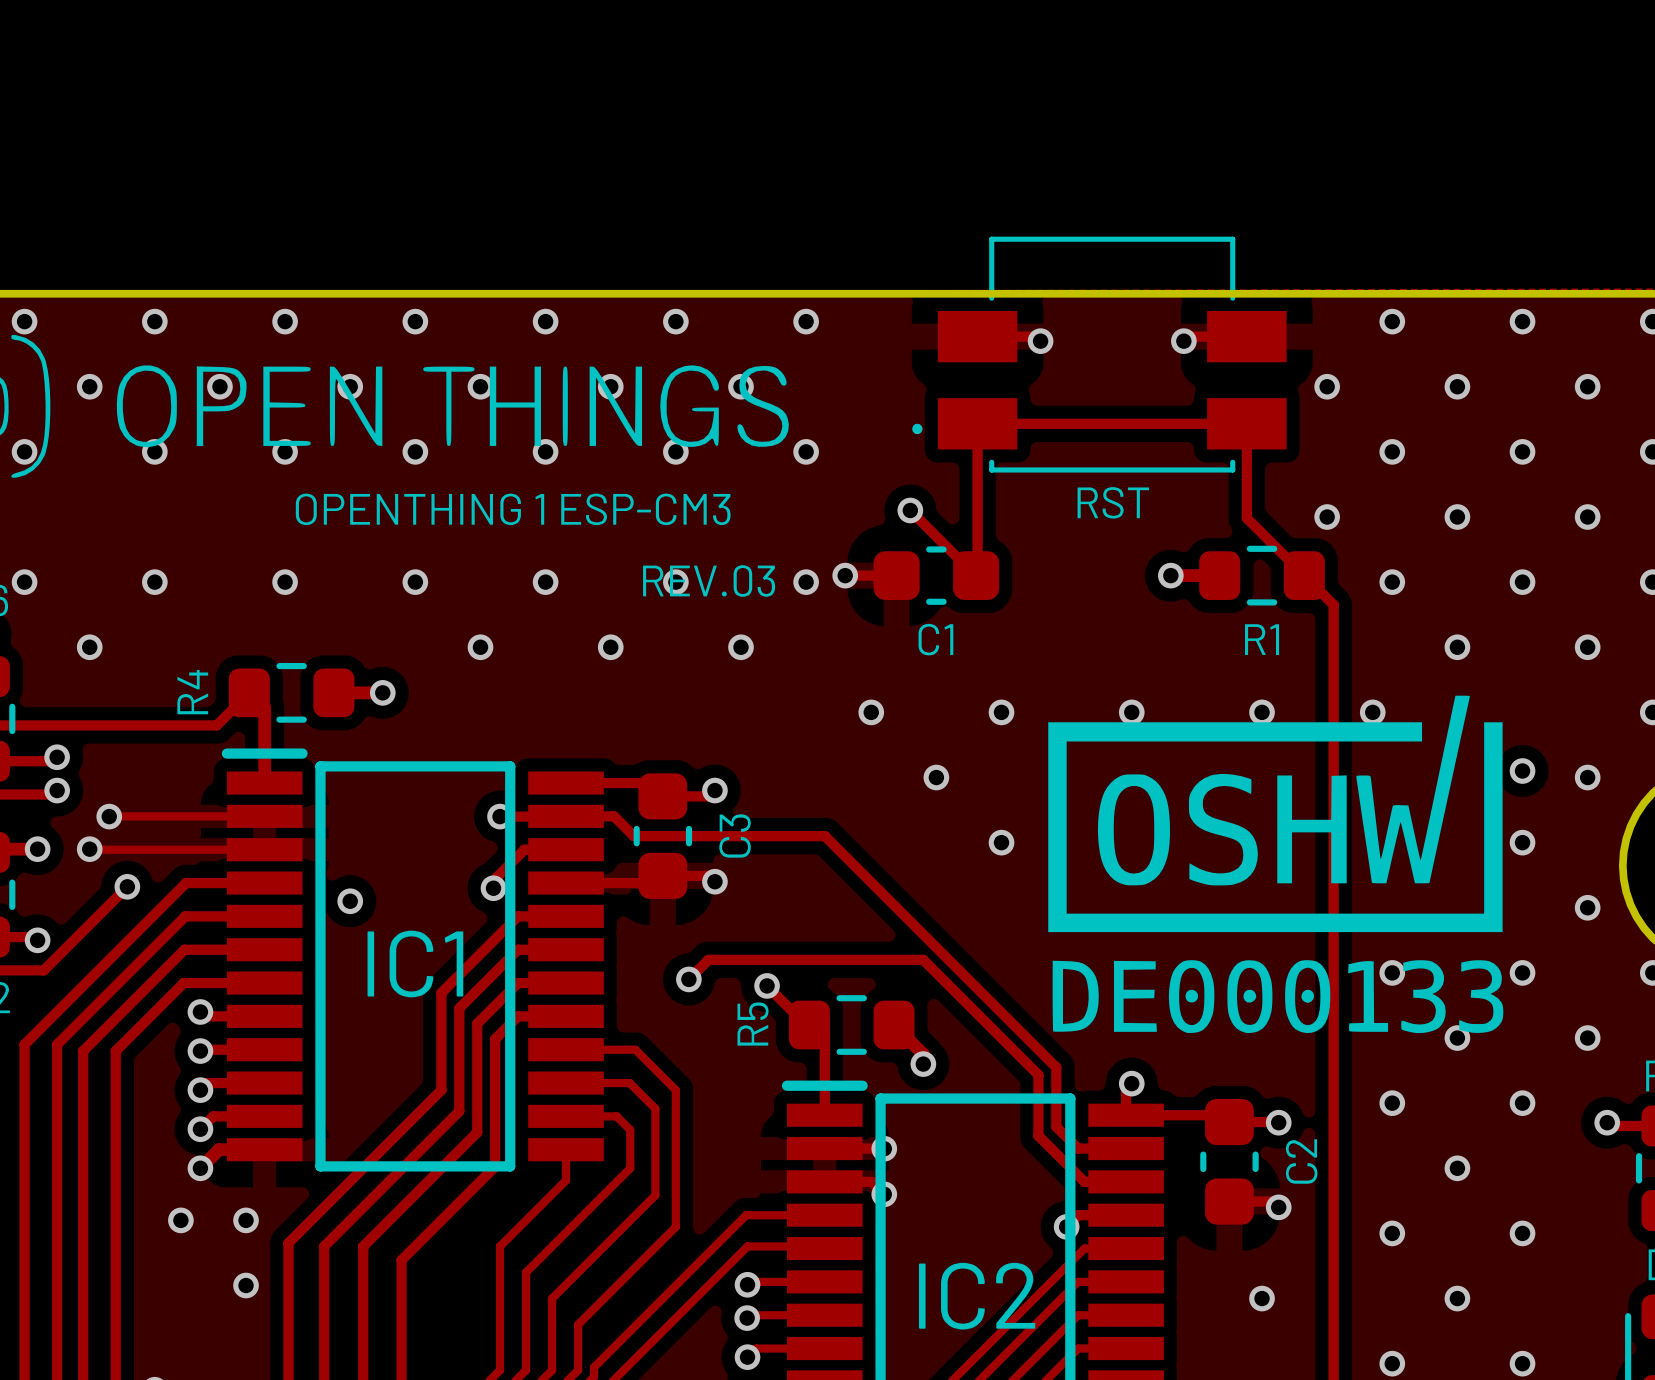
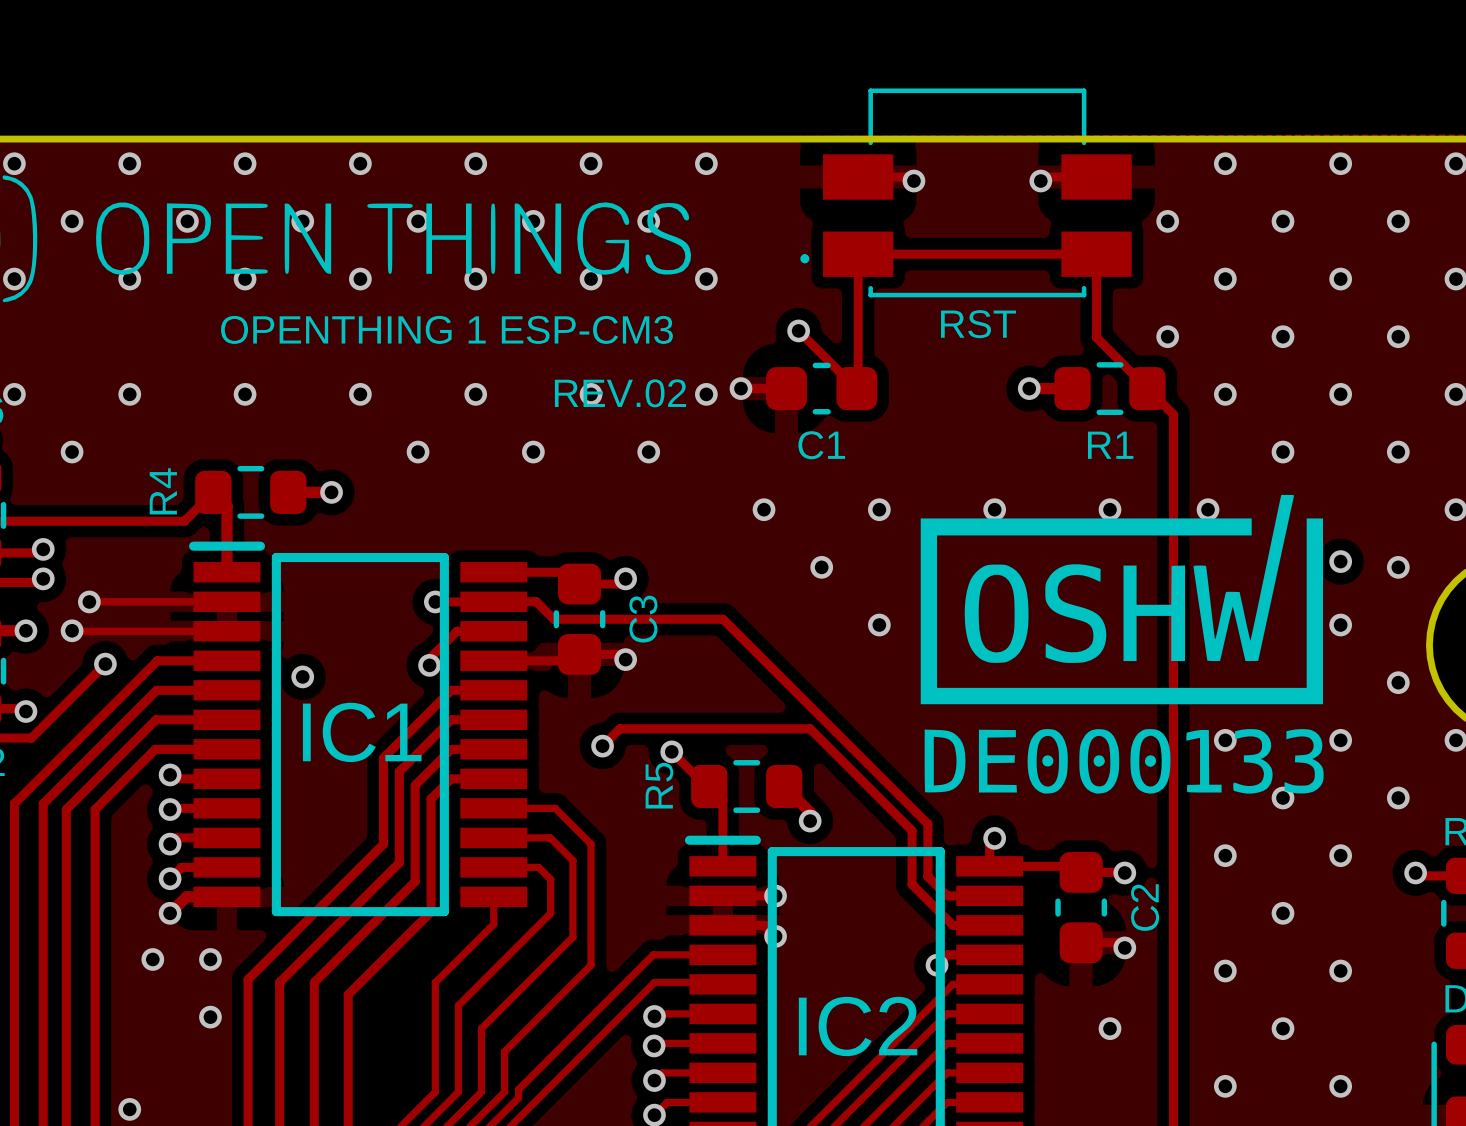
text: REV.03 (709, 581) -> REV.02 (620, 393)

